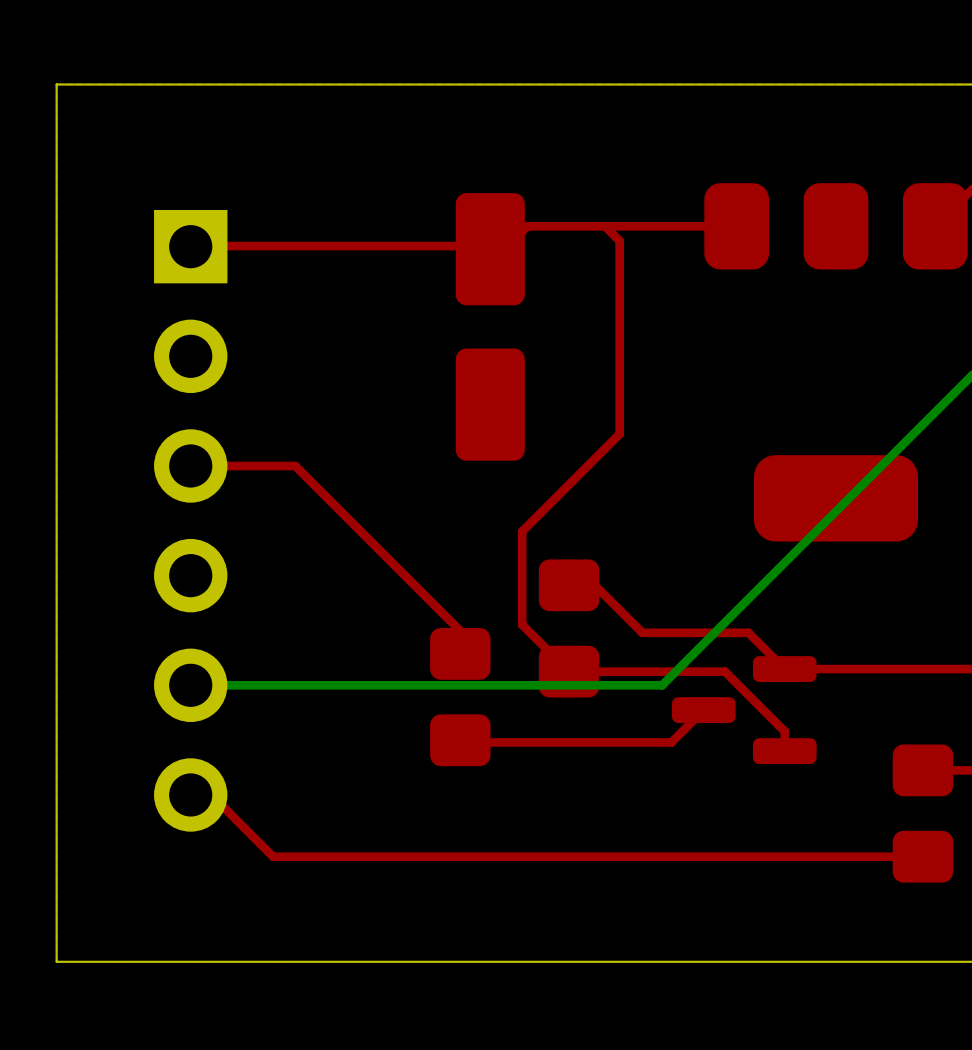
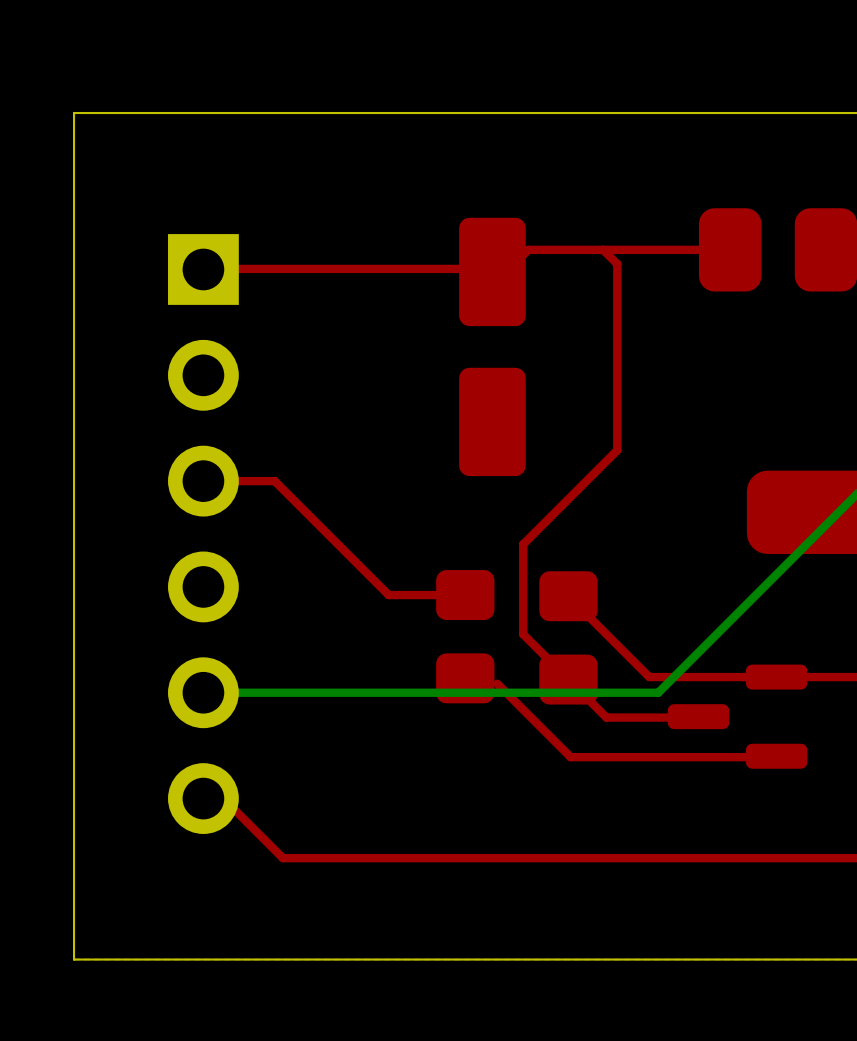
top track: (264, 465) (295, 465) (460, 630) (460, 653) -> (274, 481) (388, 595) (465, 595)
top track: (569, 585) (594, 585) (642, 632) (748, 632) (784, 669) -> (568, 596) (649, 677) (776, 677)
top track: (569, 671) (724, 671) (784, 731) (784, 751) -> (497, 683) (570, 757) (775, 757)
part position: (460, 697) -> (465, 636)
top track: (702, 711) (671, 742) (462, 742) (460, 740) (462, 738) -> (697, 717) (606, 717) (568, 679)

